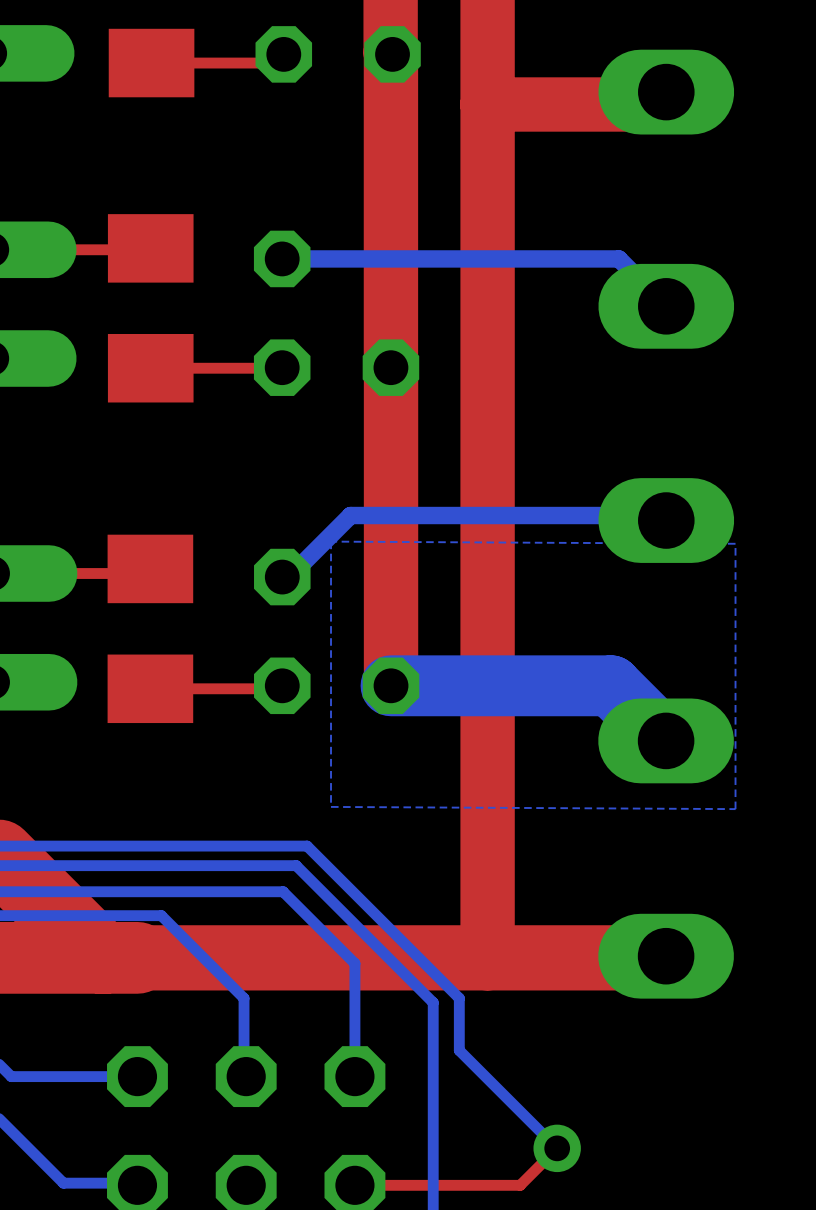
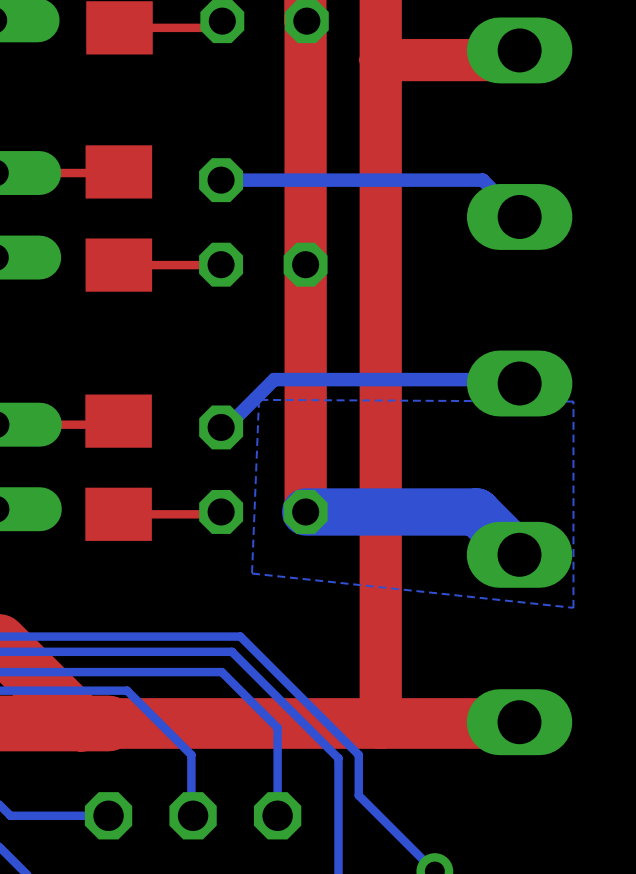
bottom zone outline: (331, 541) (331, 806) (735, 809) -> (259, 399) (252, 573) (573, 607)

